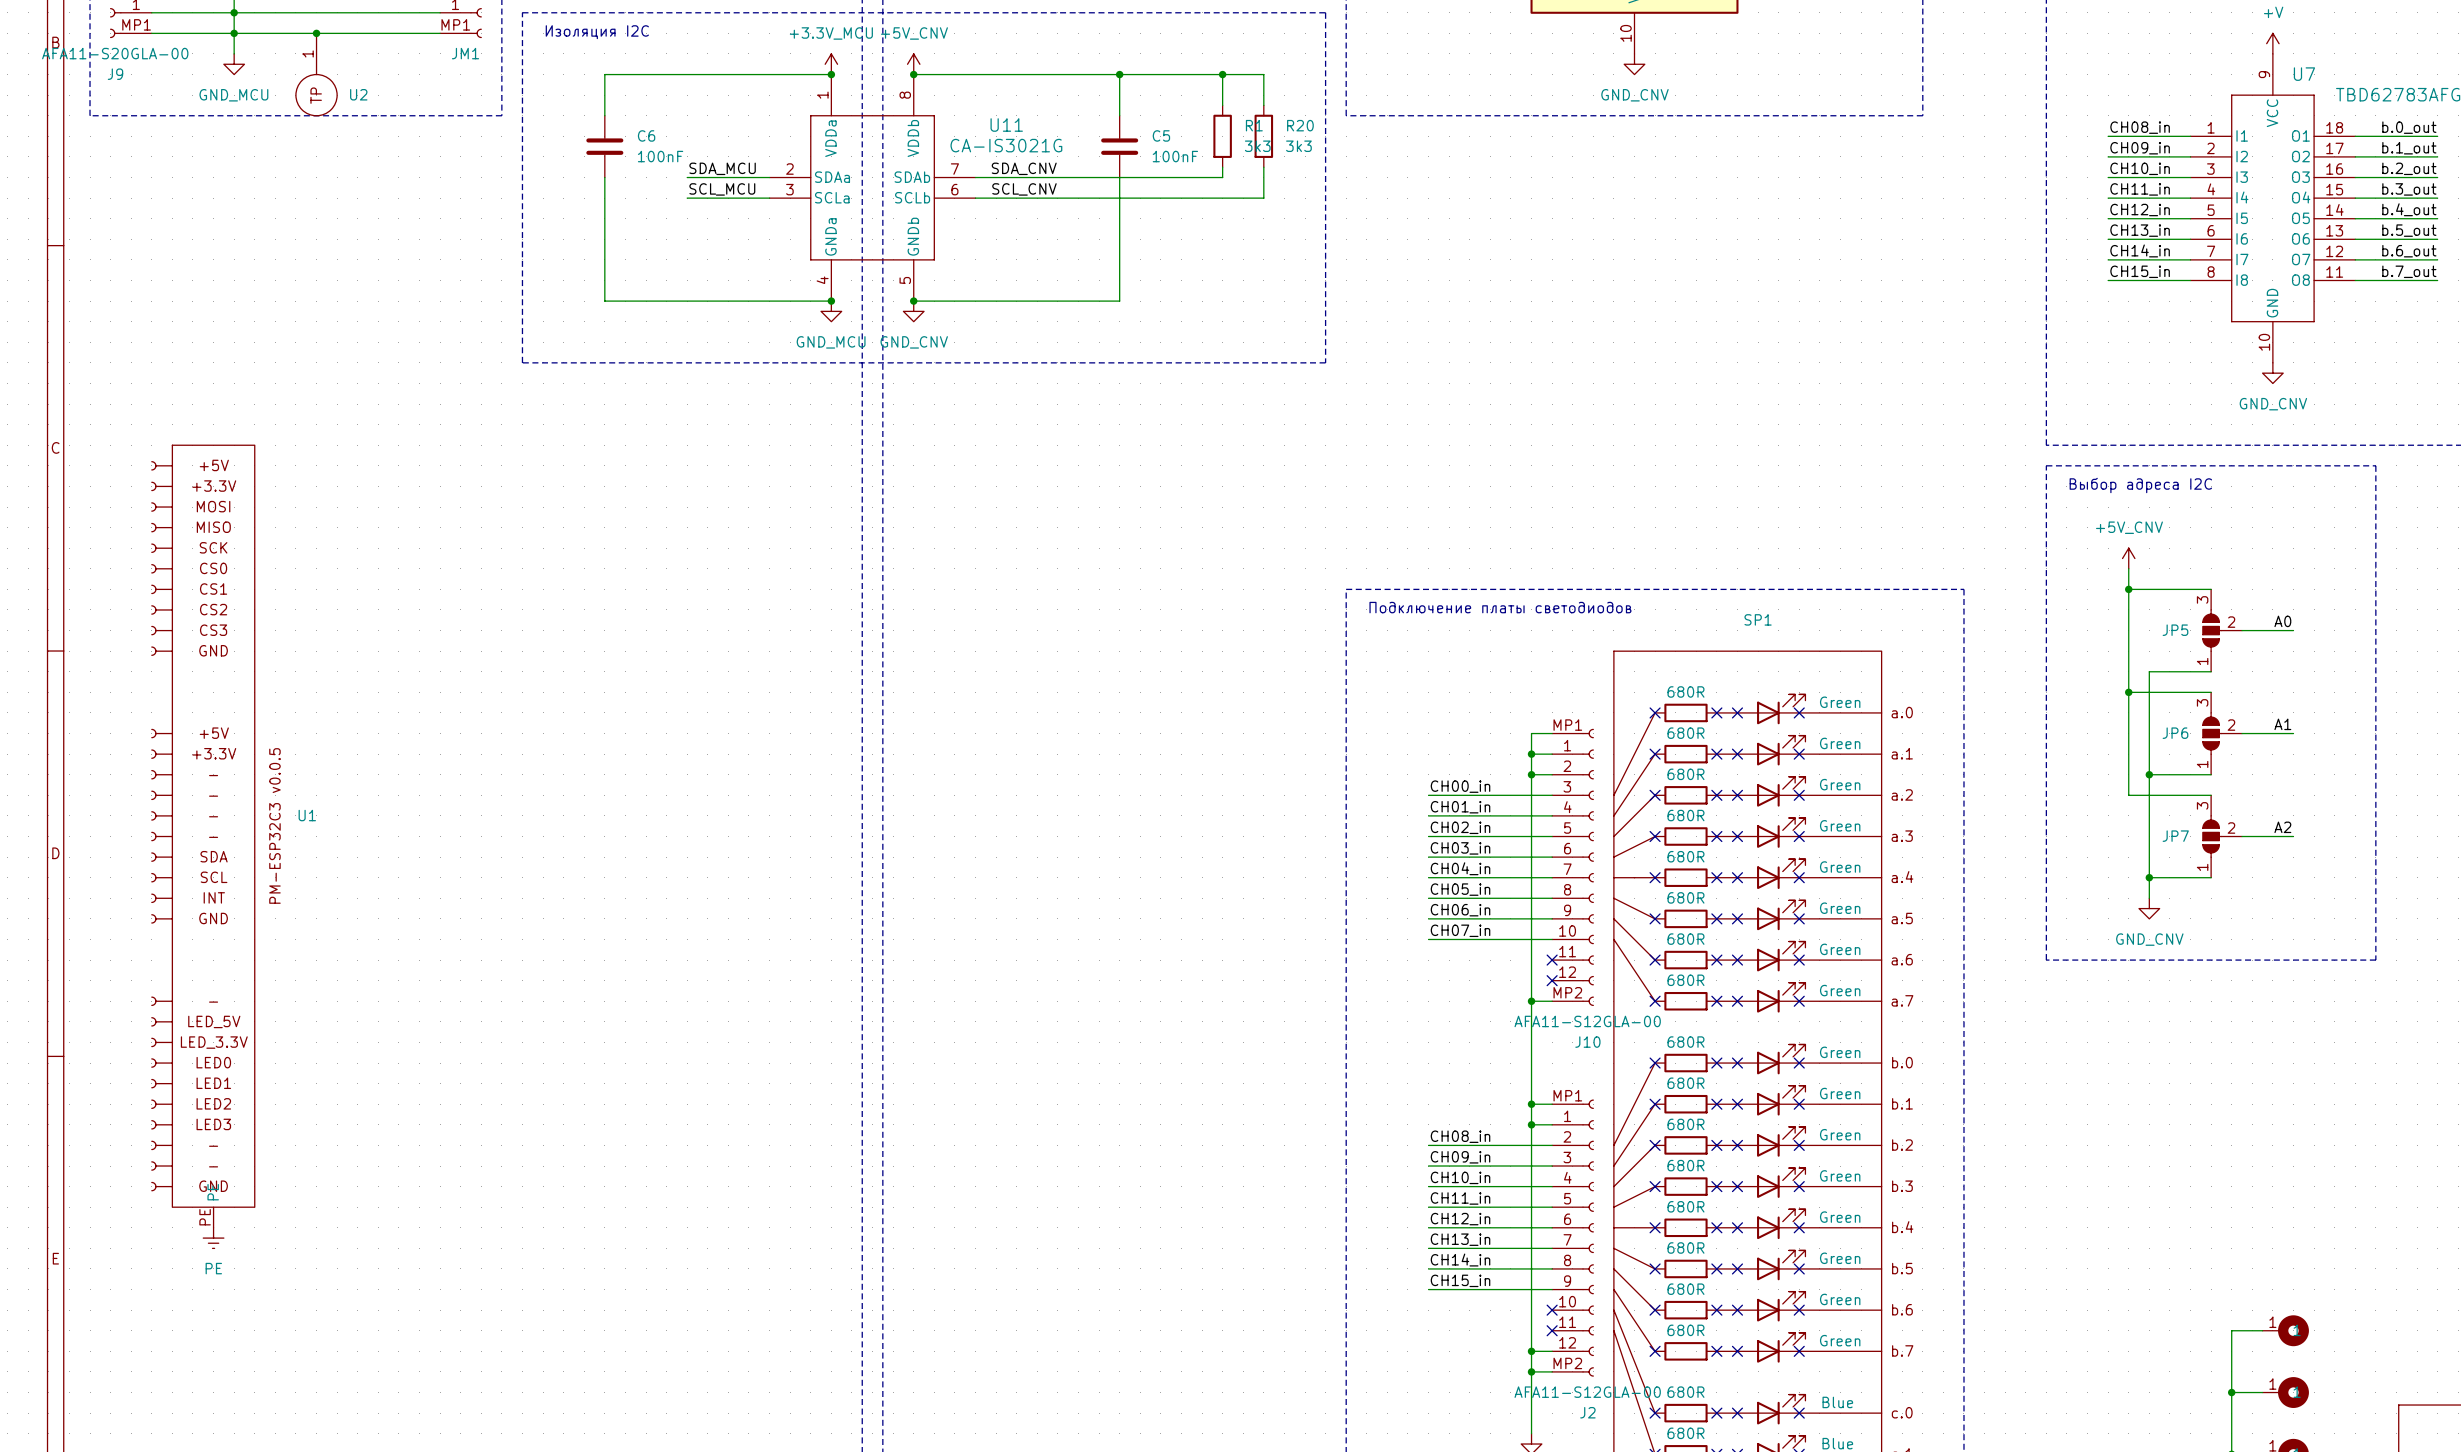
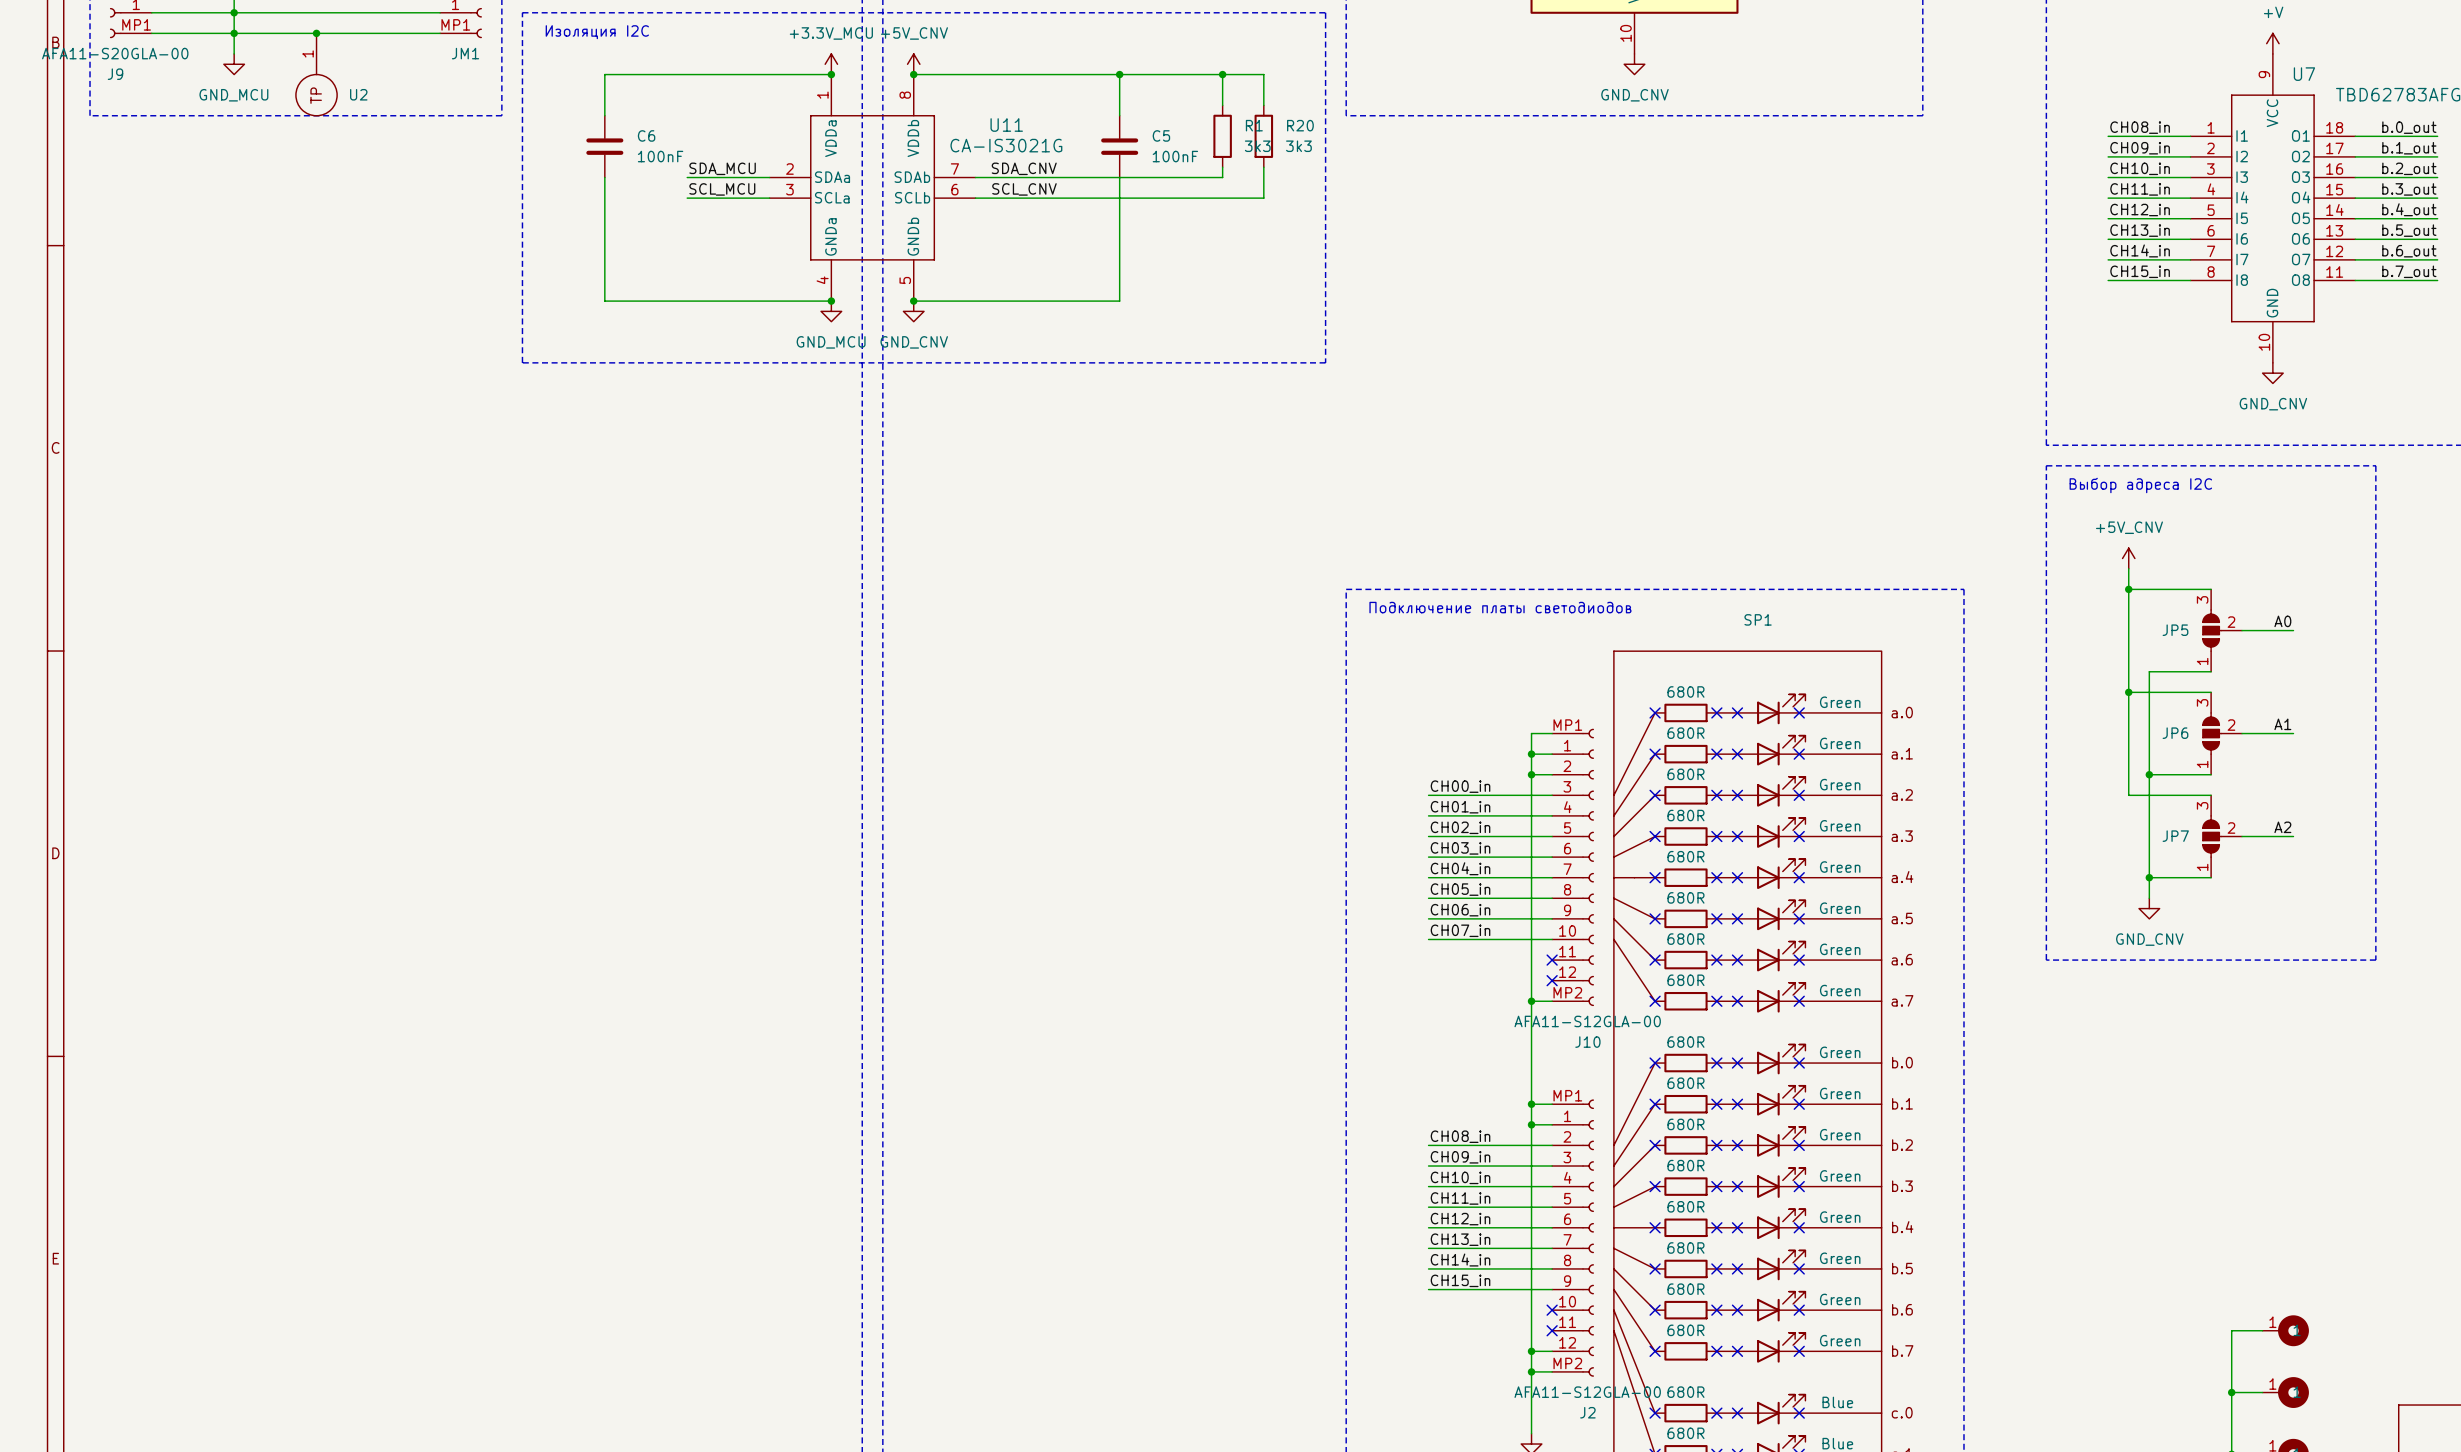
U1: (202, 836) -> none
power symbol: PE (213, 1238) -> none

